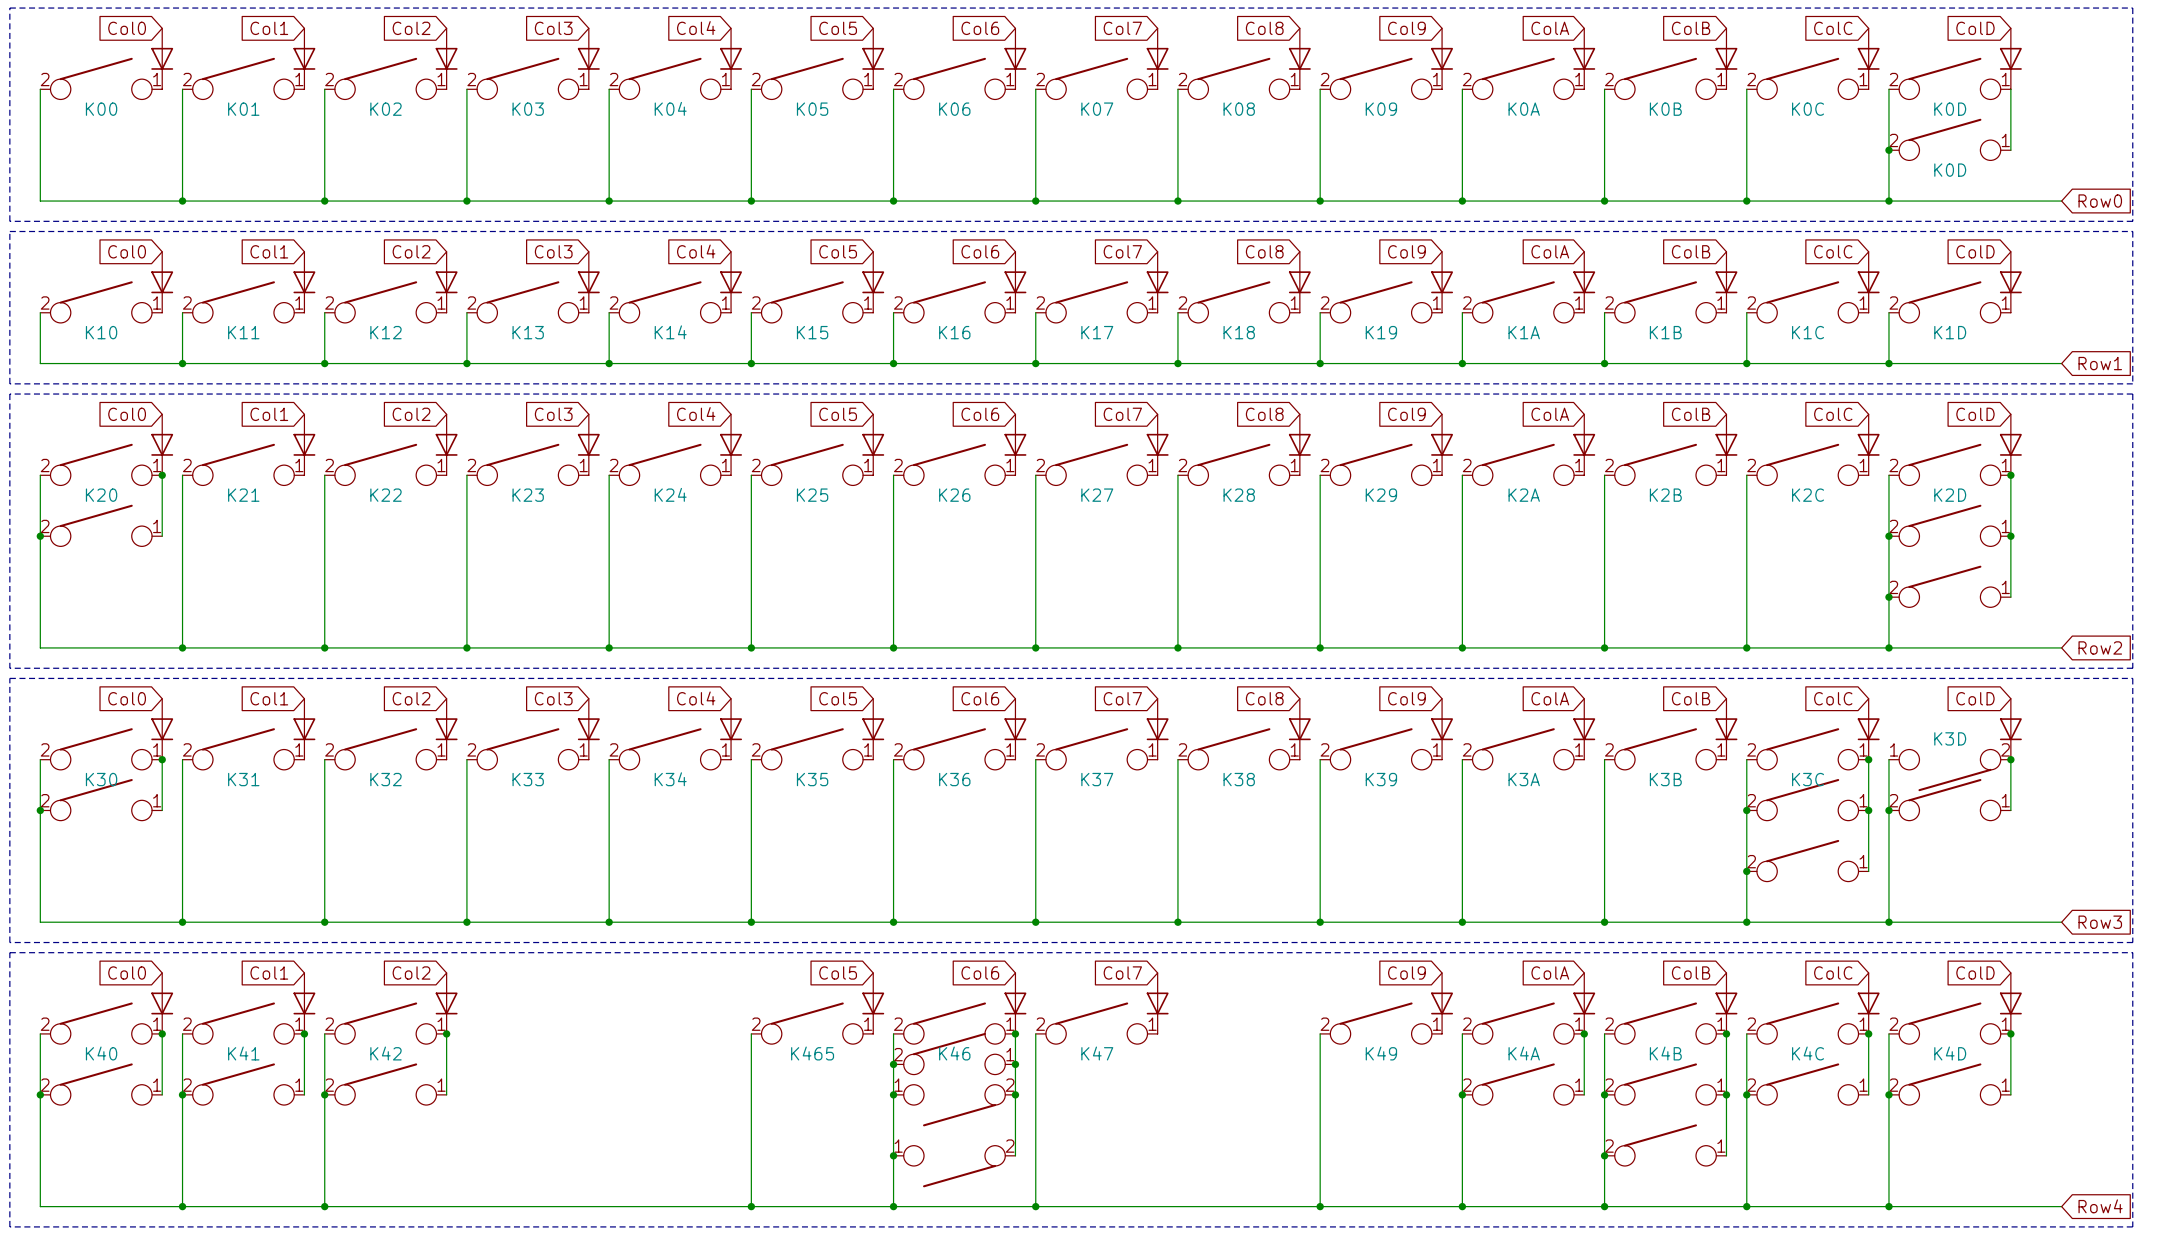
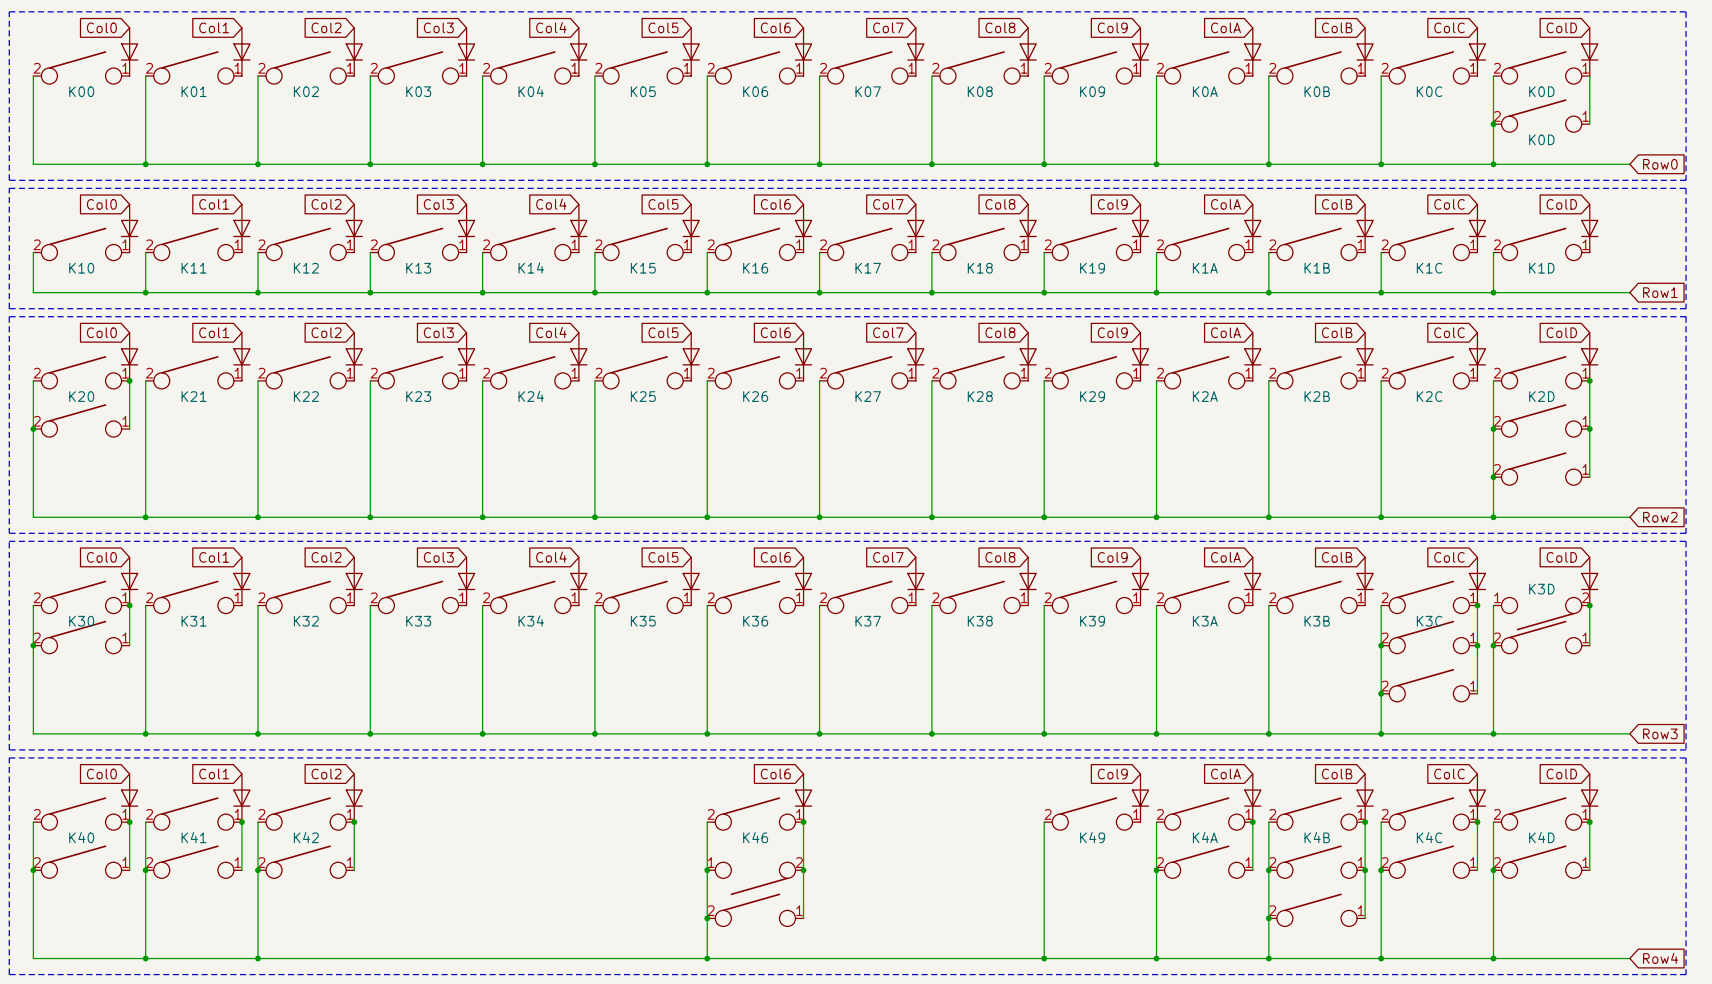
global label: Col5 (838, 972) -> none
global label: Col7 (1122, 972) -> none
part: (873, 1003) -> none
part: (1157, 1003) -> none
part: K465 (812, 1023) -> none
part: K47 (1096, 1023) -> none
wire: (751, 1033) (751, 1206) -> none
wire: (1035, 1033) (1035, 1206) -> none
part: (954, 1053) -> none
junction: (893, 1064) -> none
junction: (1015, 1064) -> none
part rotation: 0° (954, 1166) -> 180° (755, 909)
junction: (751, 1206) -> none
junction: (1035, 1206) -> none

